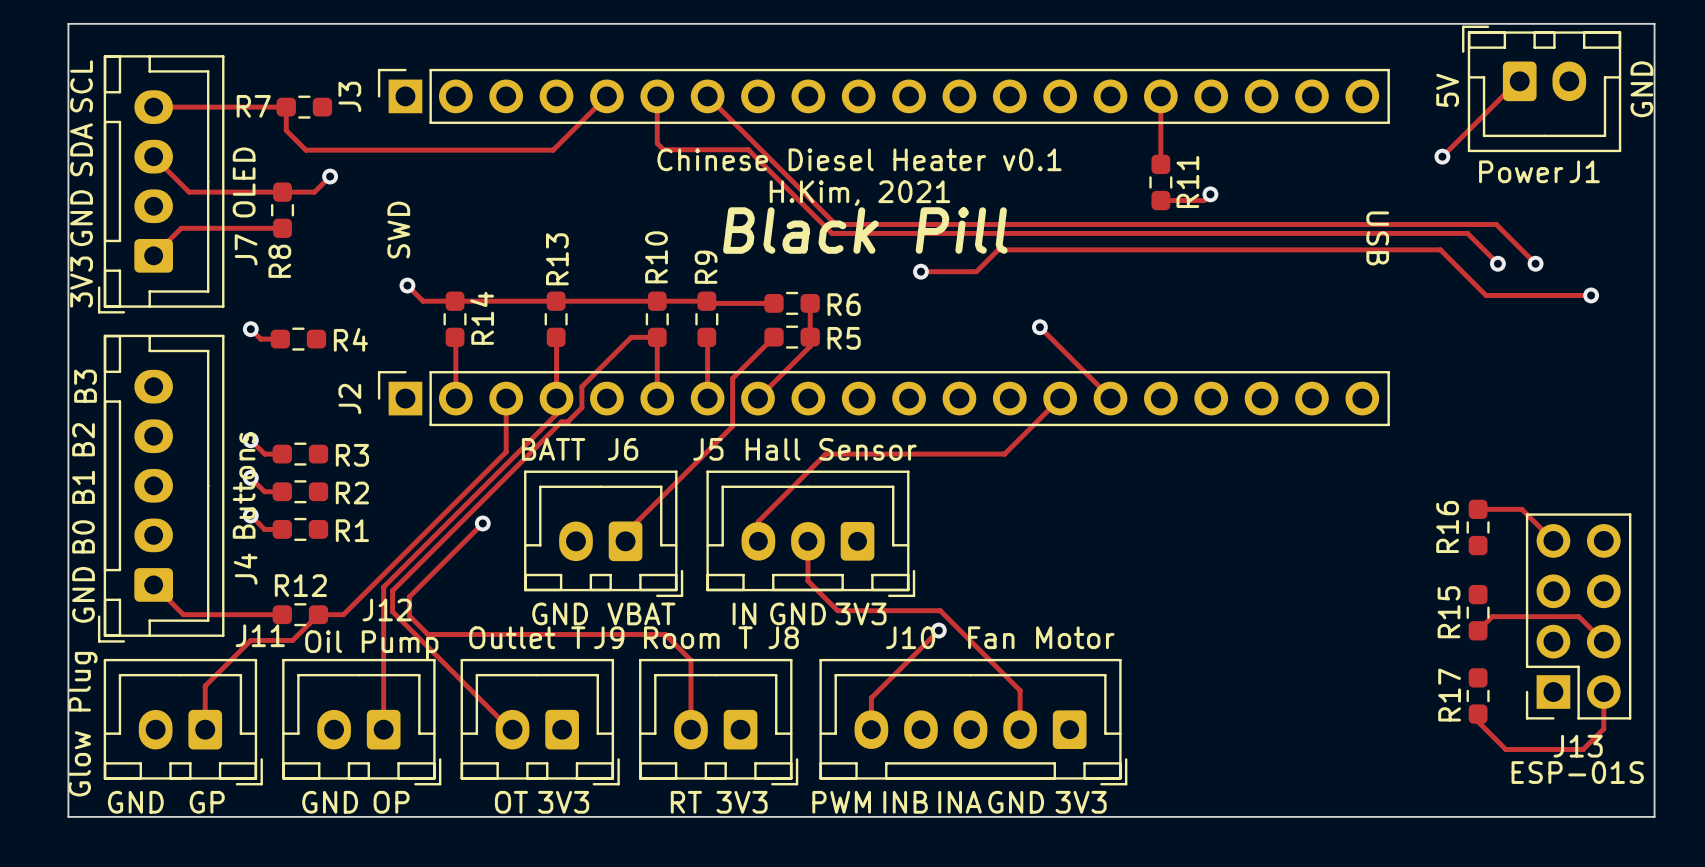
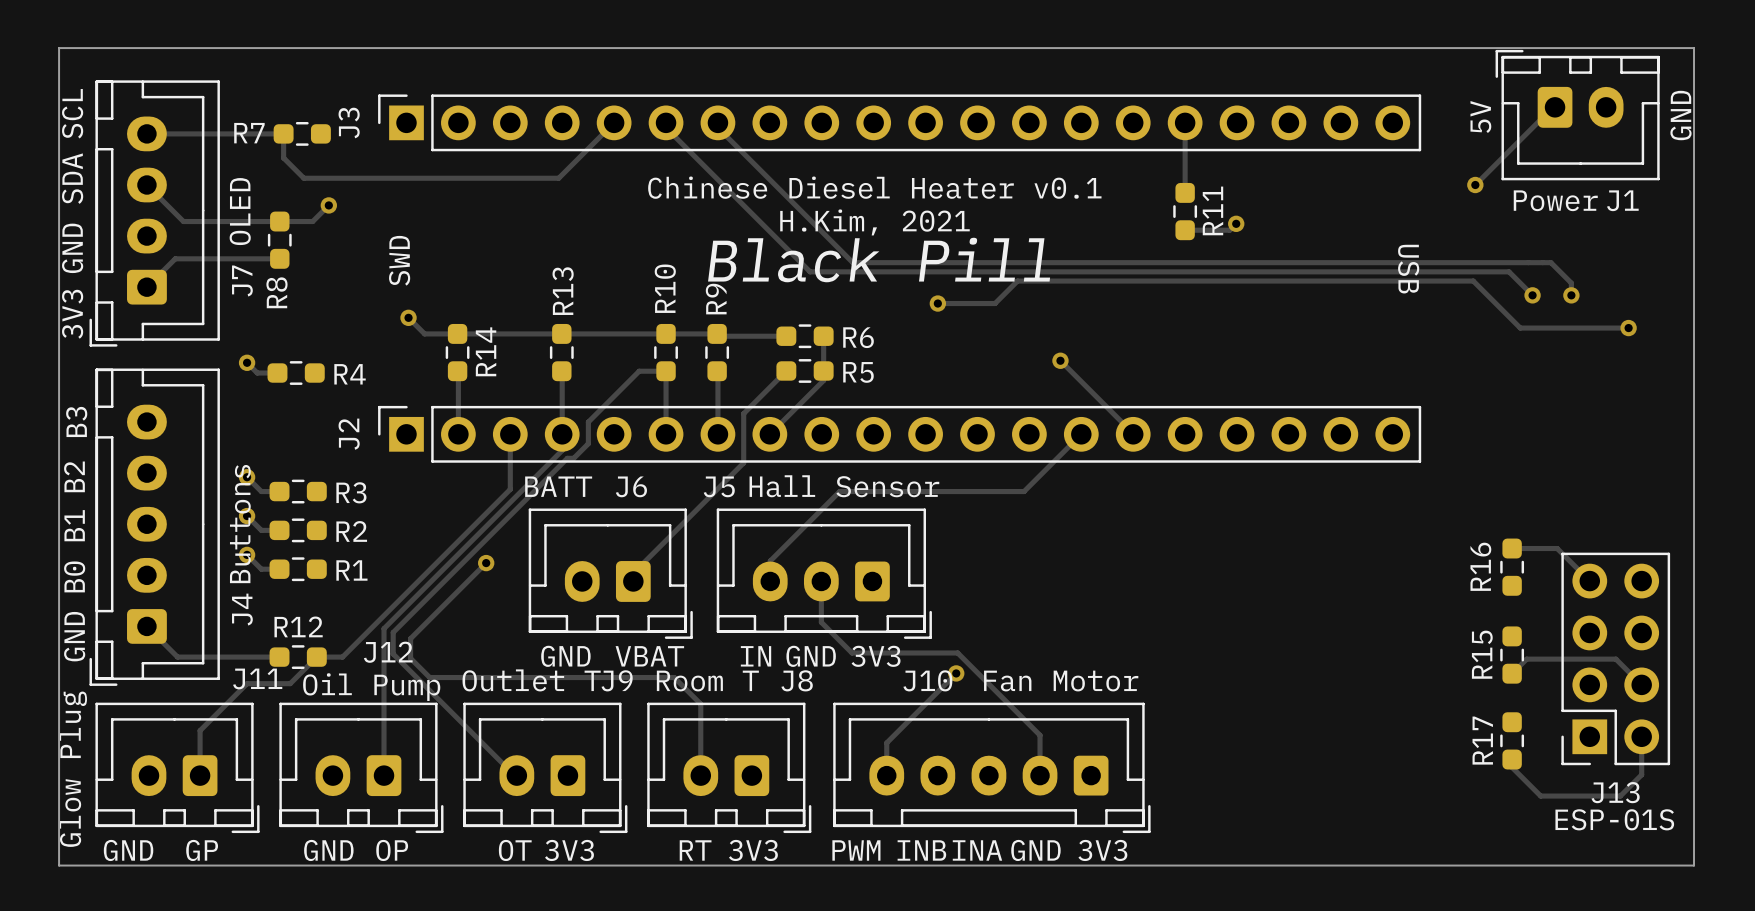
track: (657, 96) (657, 143) (663, 149) (748, 149) (832, 233) (1467, 233) (1475, 240) -> (666, 127) (810, 271) (1509, 271)
track: (707, 96) (835, 224) (1496, 224) (1535, 263) -> (725, 135) (852, 262) (1550, 262) (1571, 283) (1571, 295)

